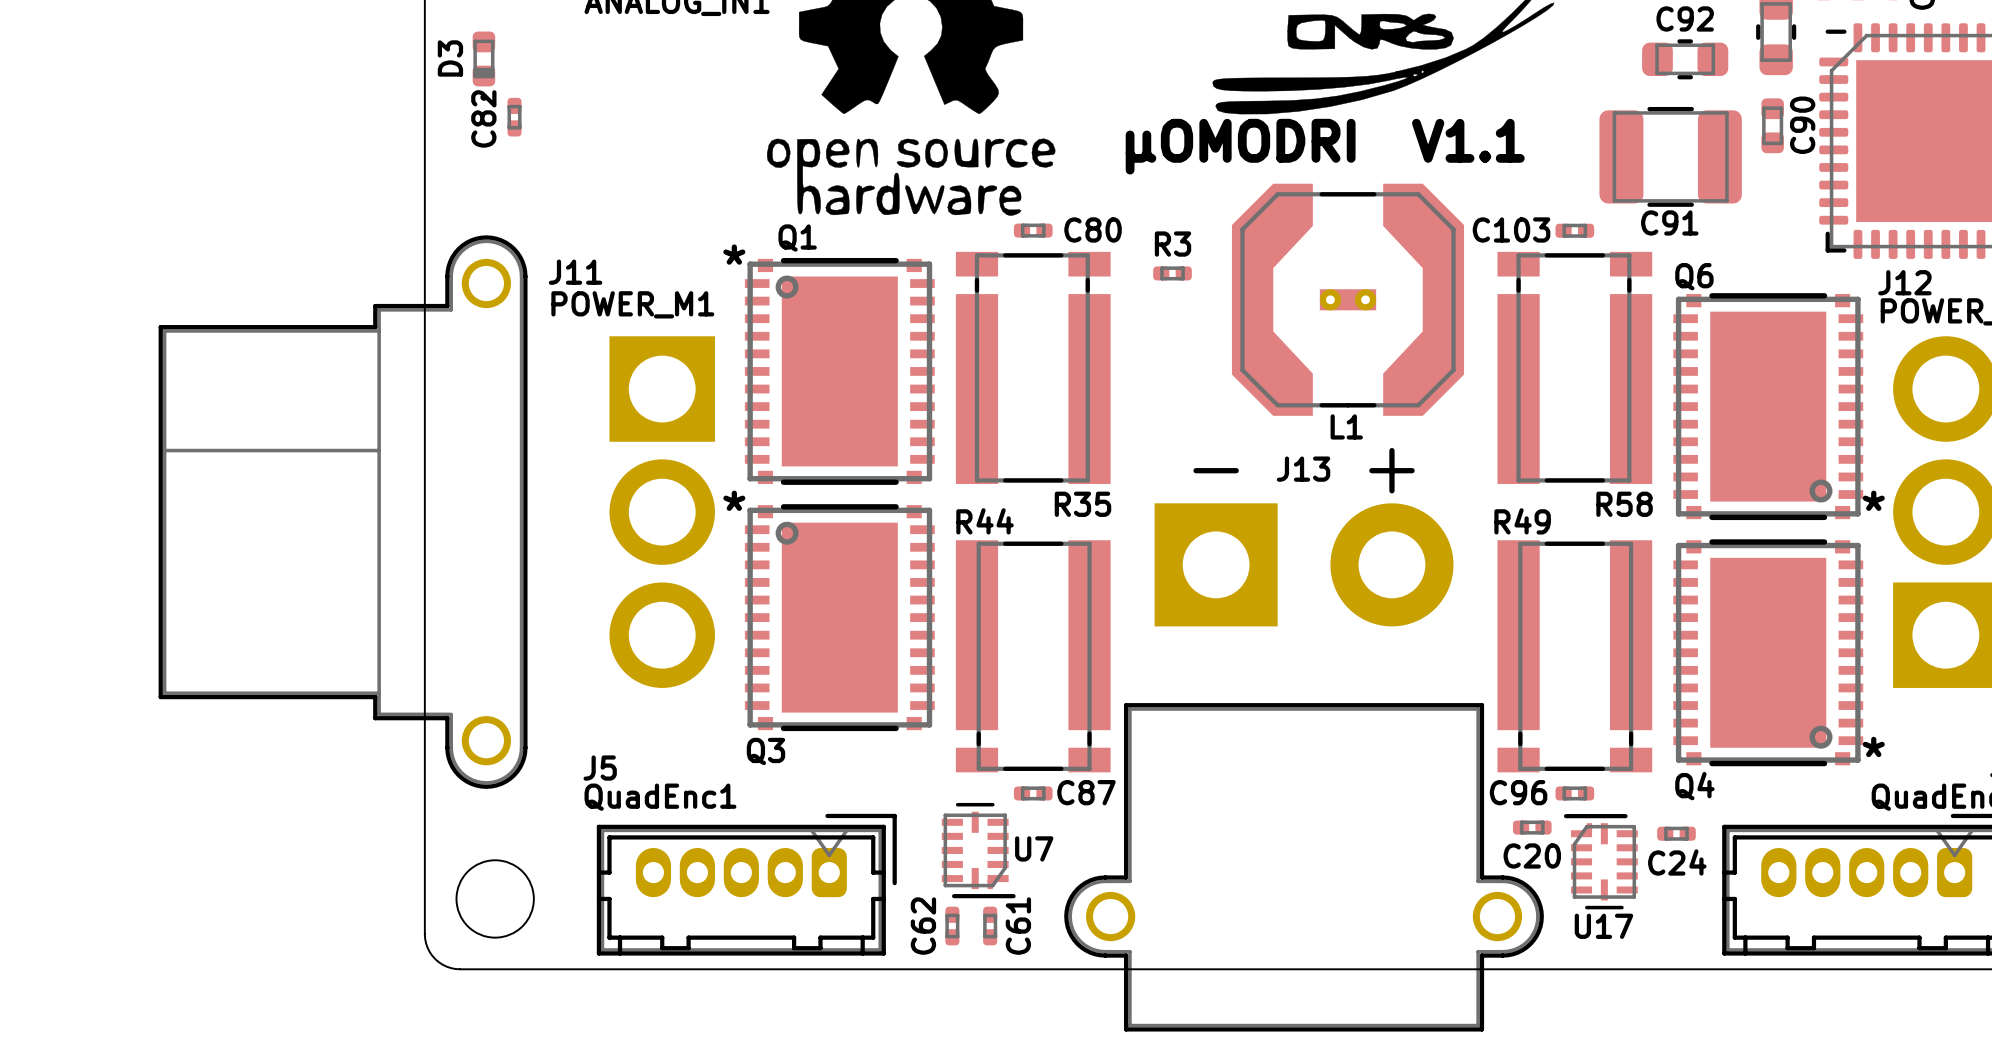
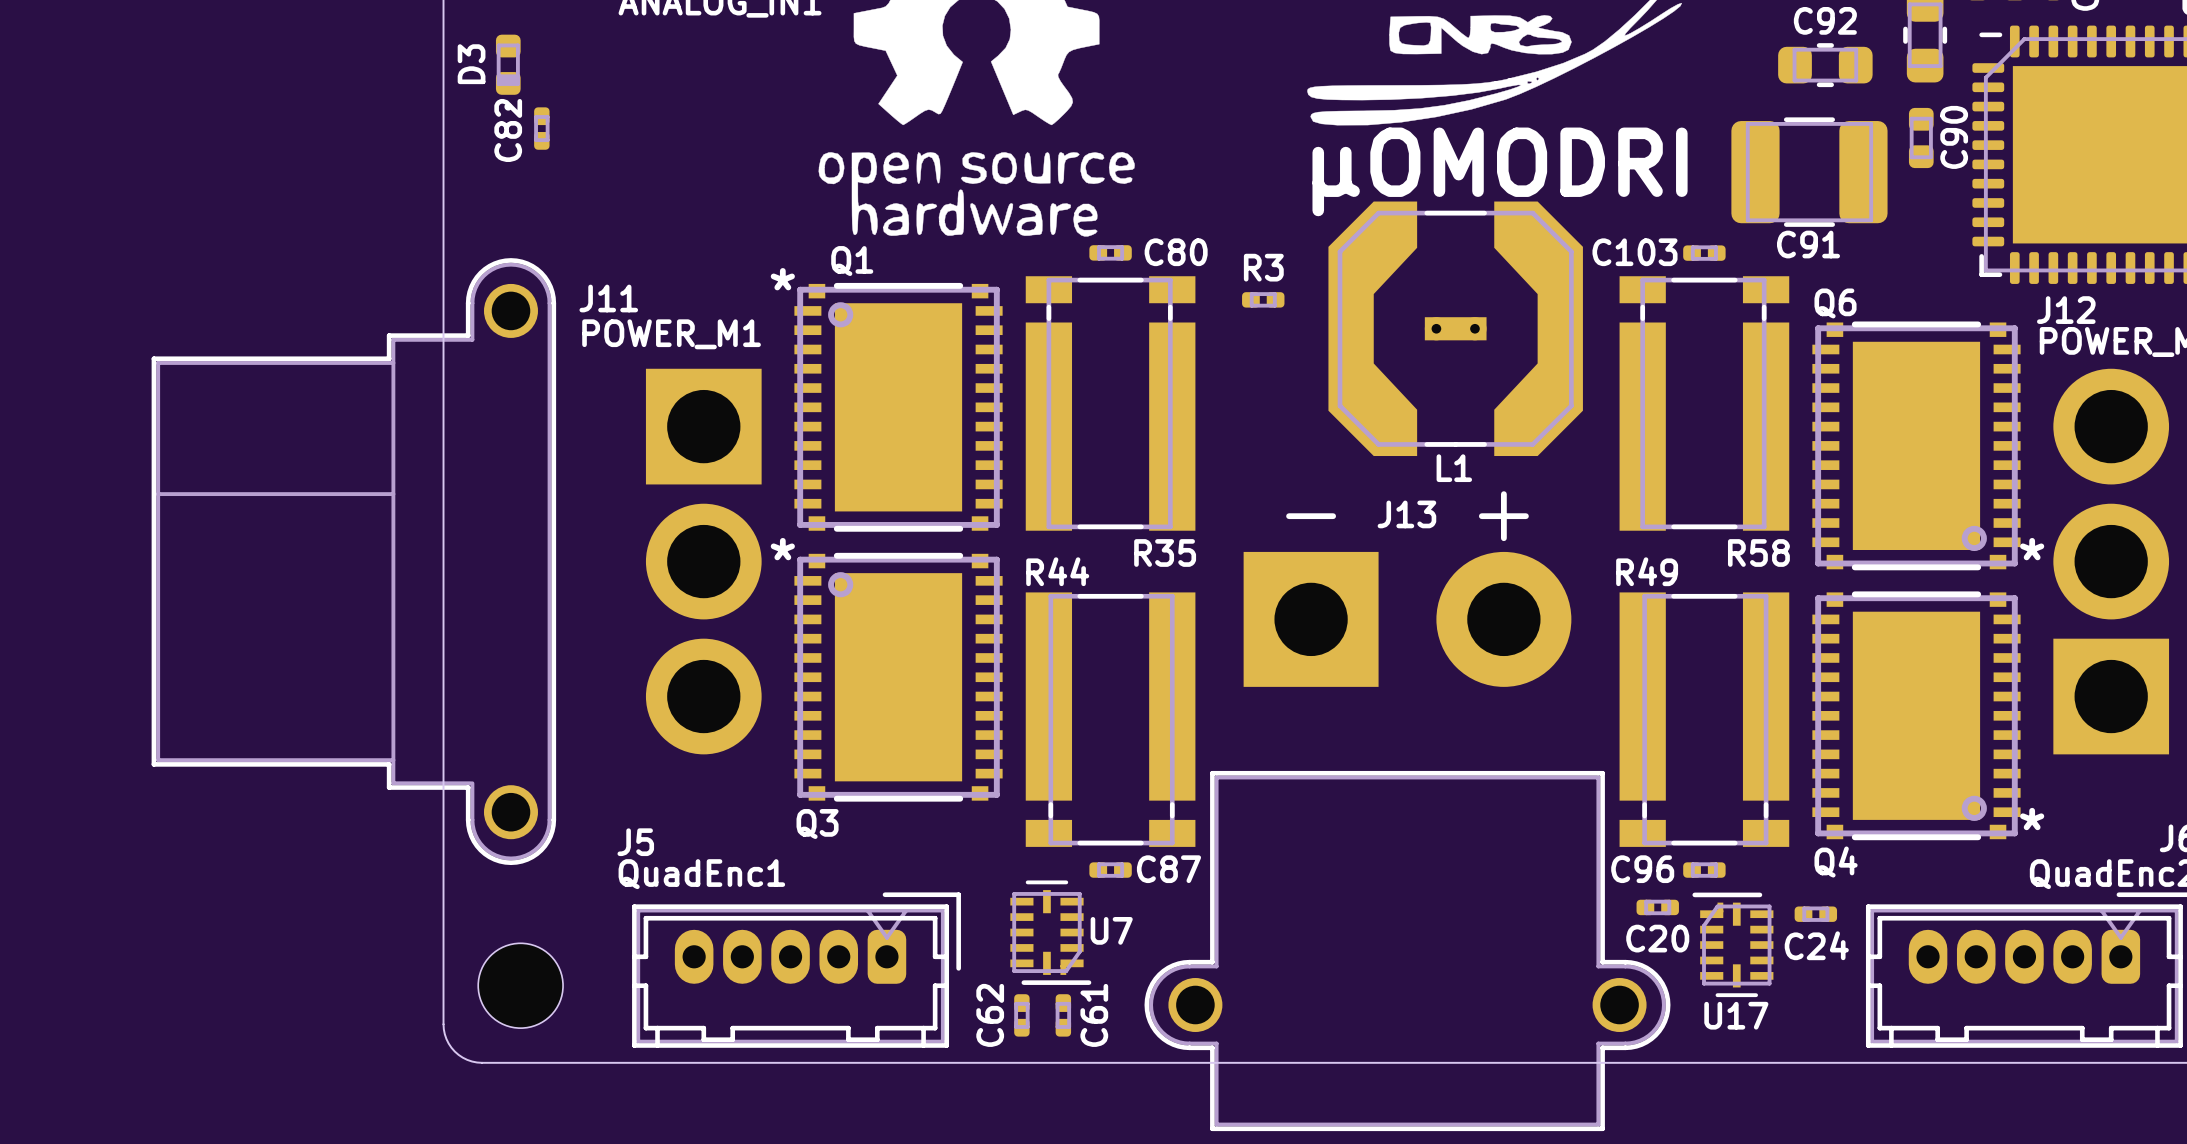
text: µOMODRI V1.1 (1325, 146) -> µOMODRI (1500, 171)

